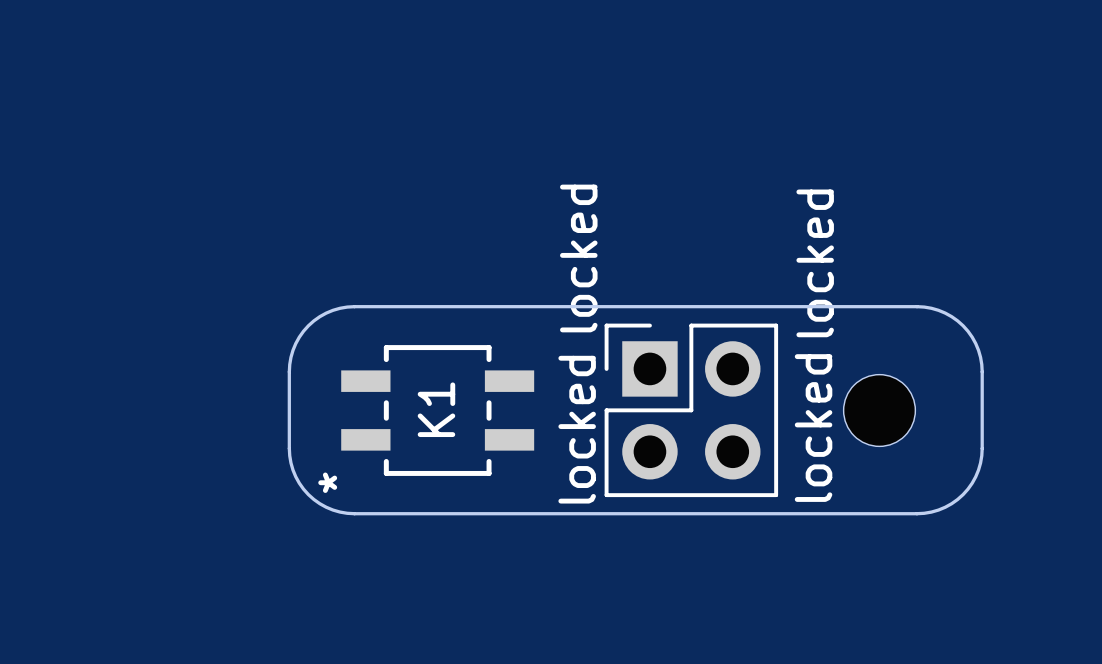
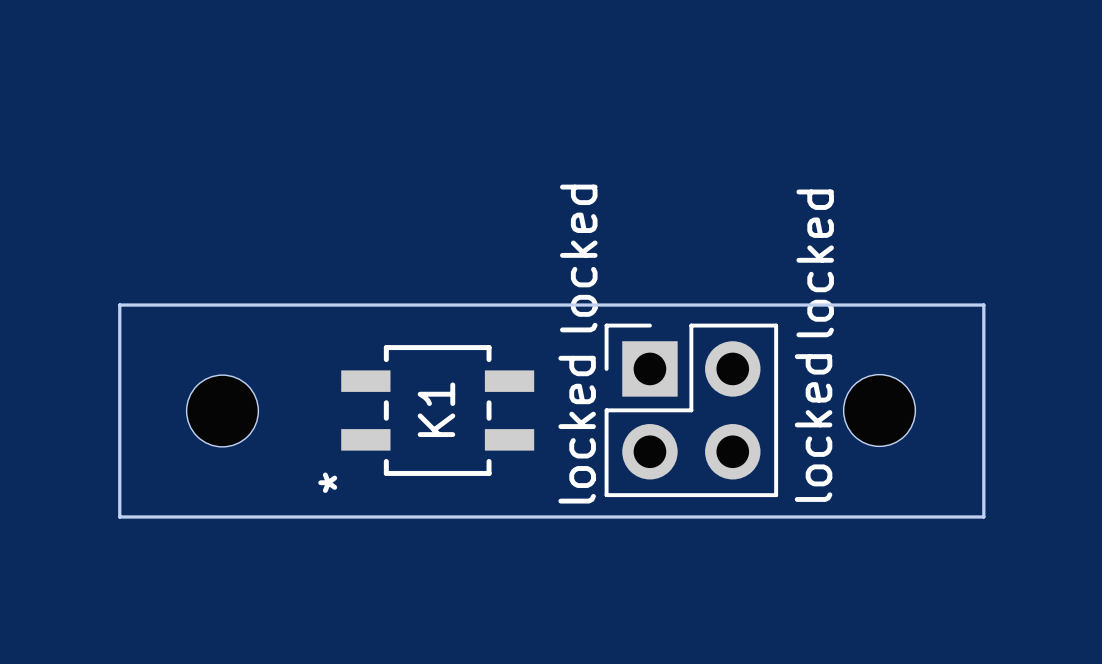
board edge: (354, 306) (916, 306) (931, 308) (945, 313) (957, 320) (967, 331) (978, 350) (982, 371) (980, 463) (972, 483) (957, 499) (938, 510) (924, 513) (354, 513) (340, 512) (326, 507) (313, 499) (303, 489) (292, 470) (289, 448) (289, 364) (295, 343) (303, 331) (313, 320) (333, 310) (354, 306) -> (119, 305) (119, 516) (983, 516) (983, 305) (119, 305)
part: none -> (222, 411)

